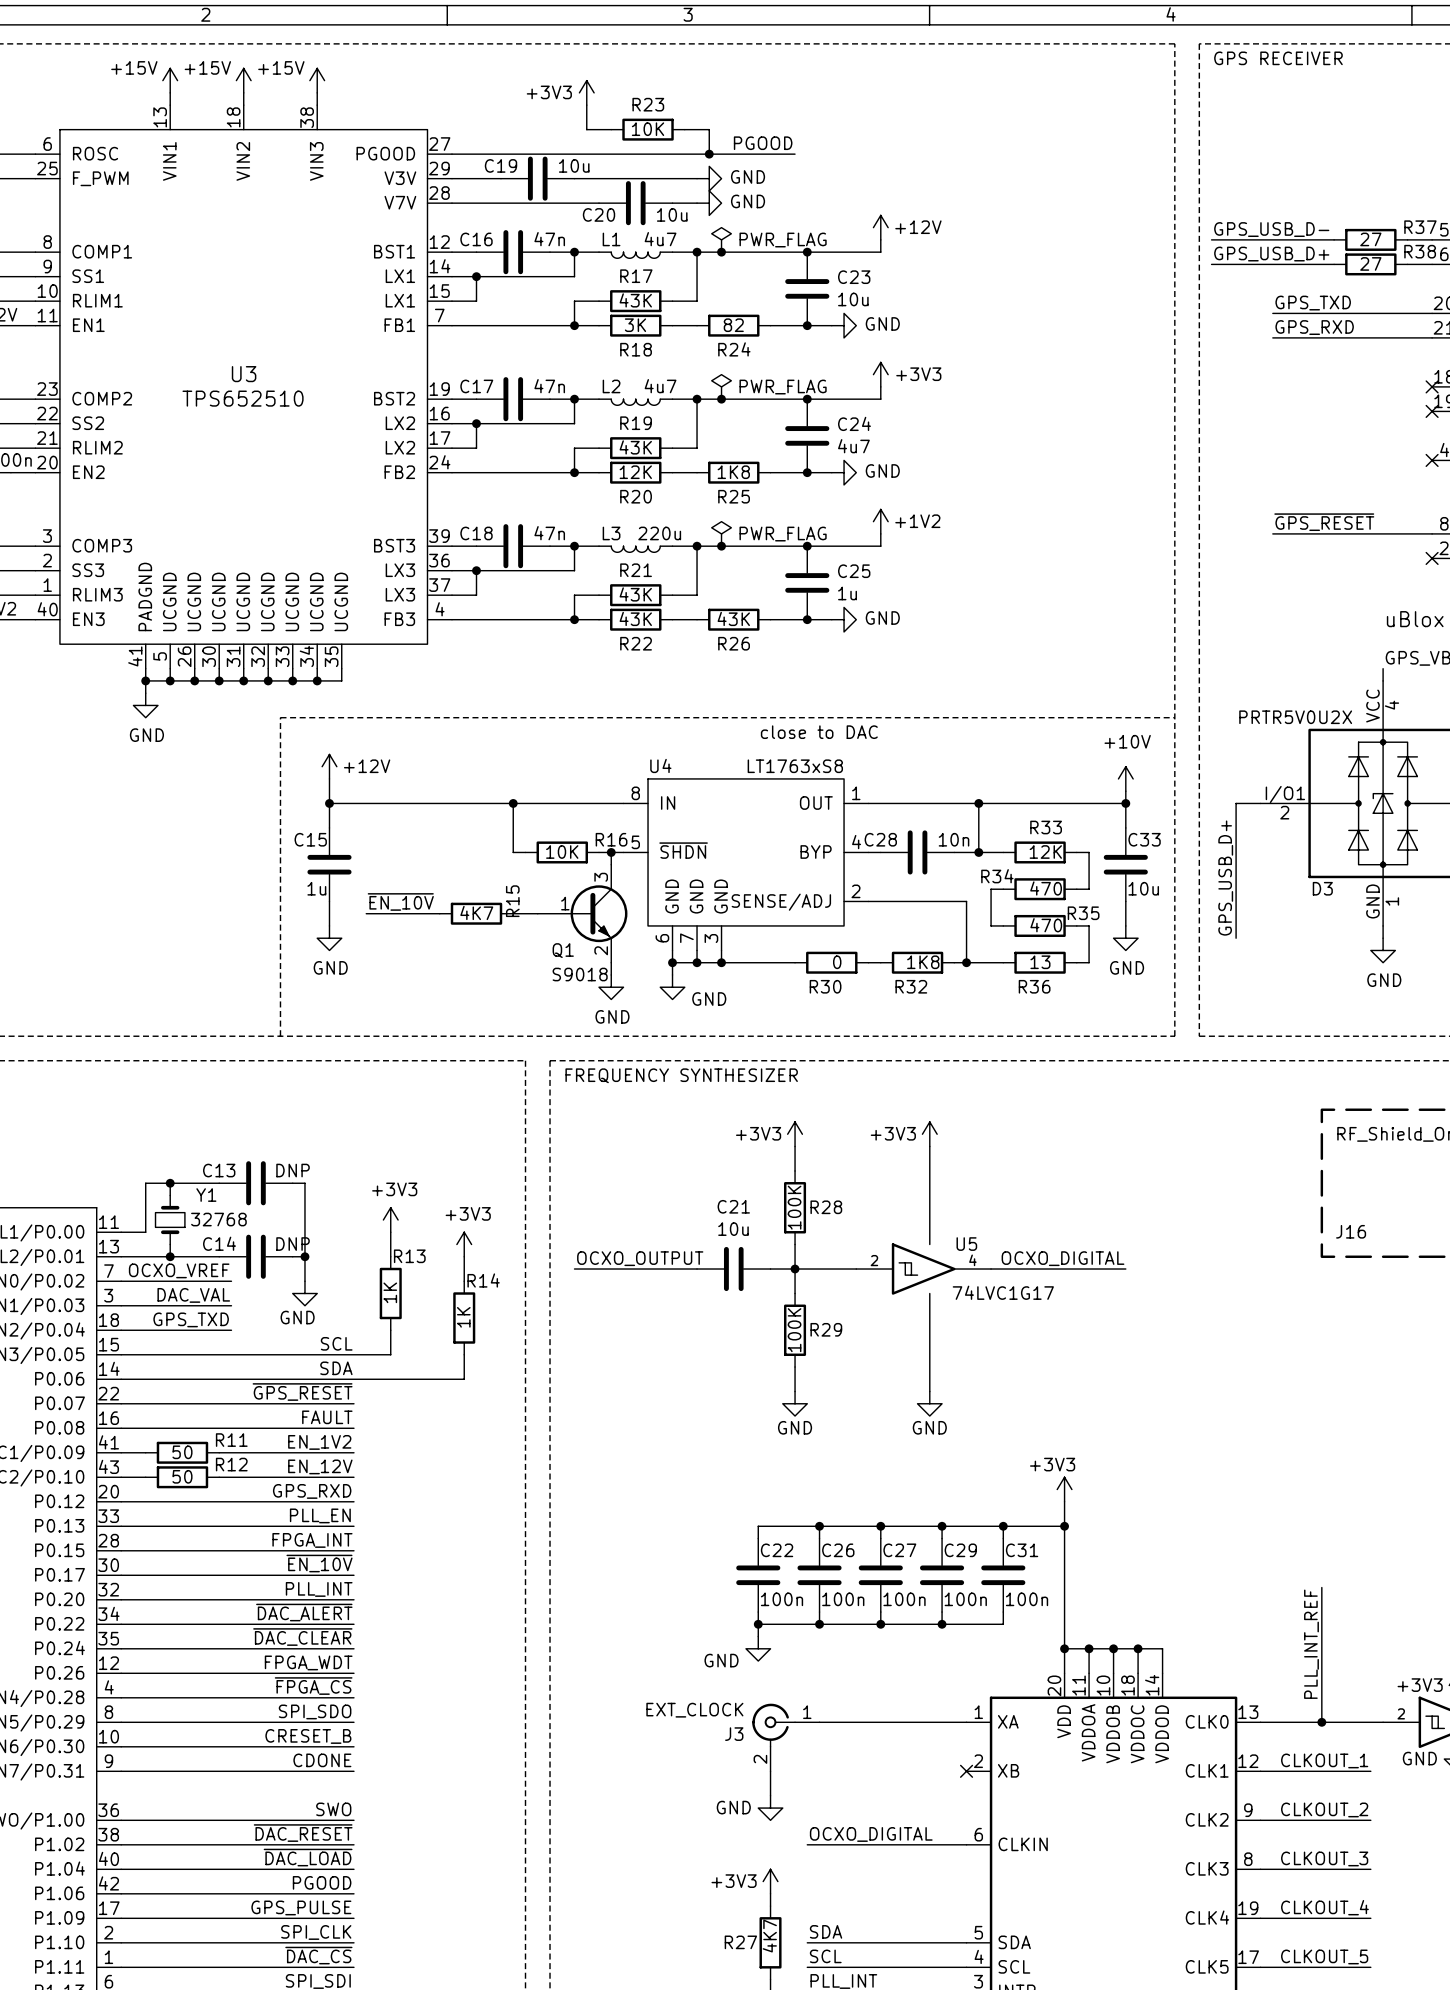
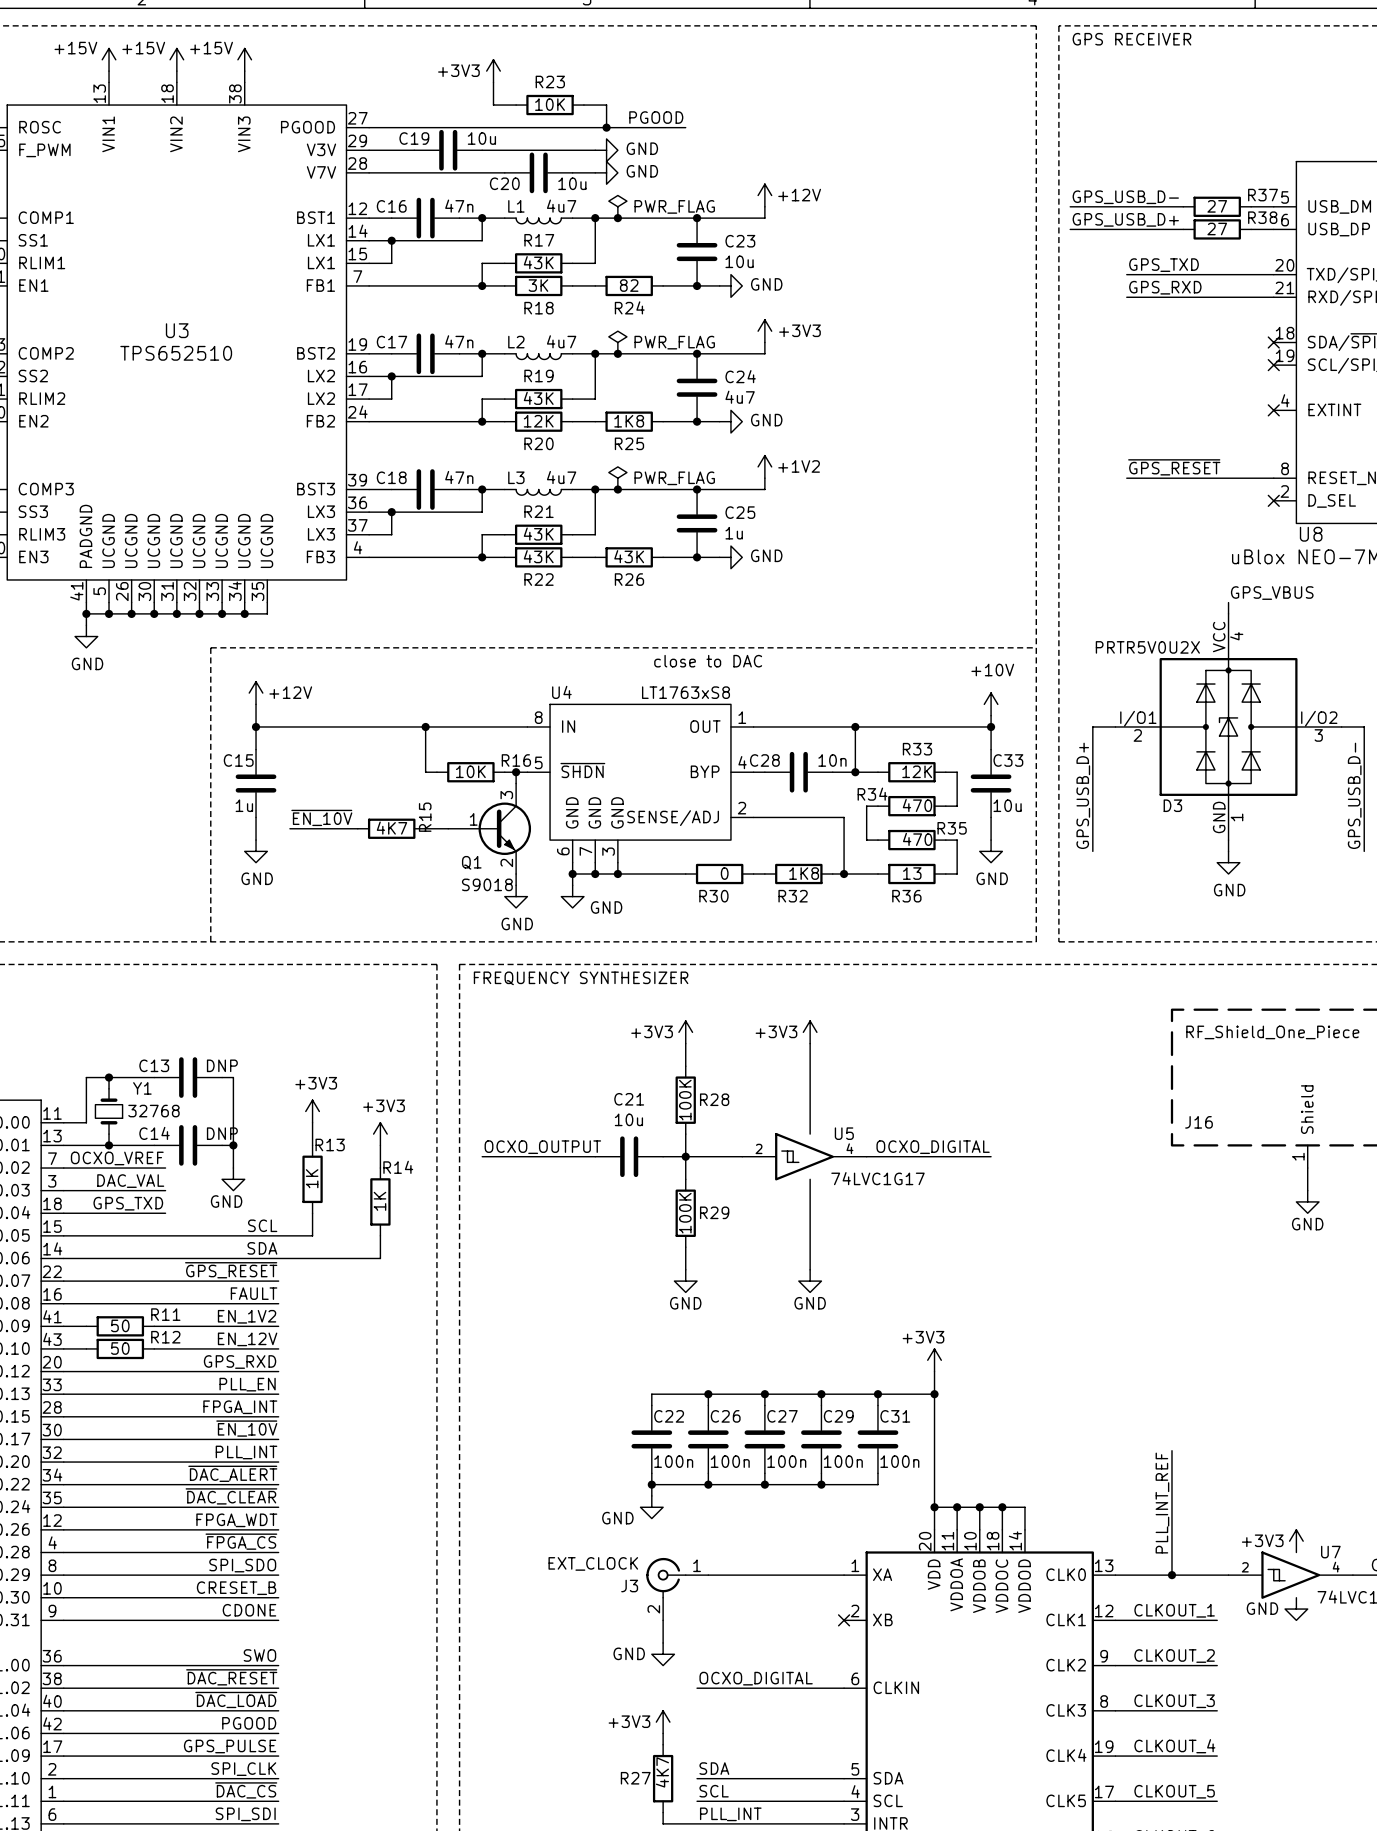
L3 value: 220u (659, 533) -> 4u7 (561, 477)

